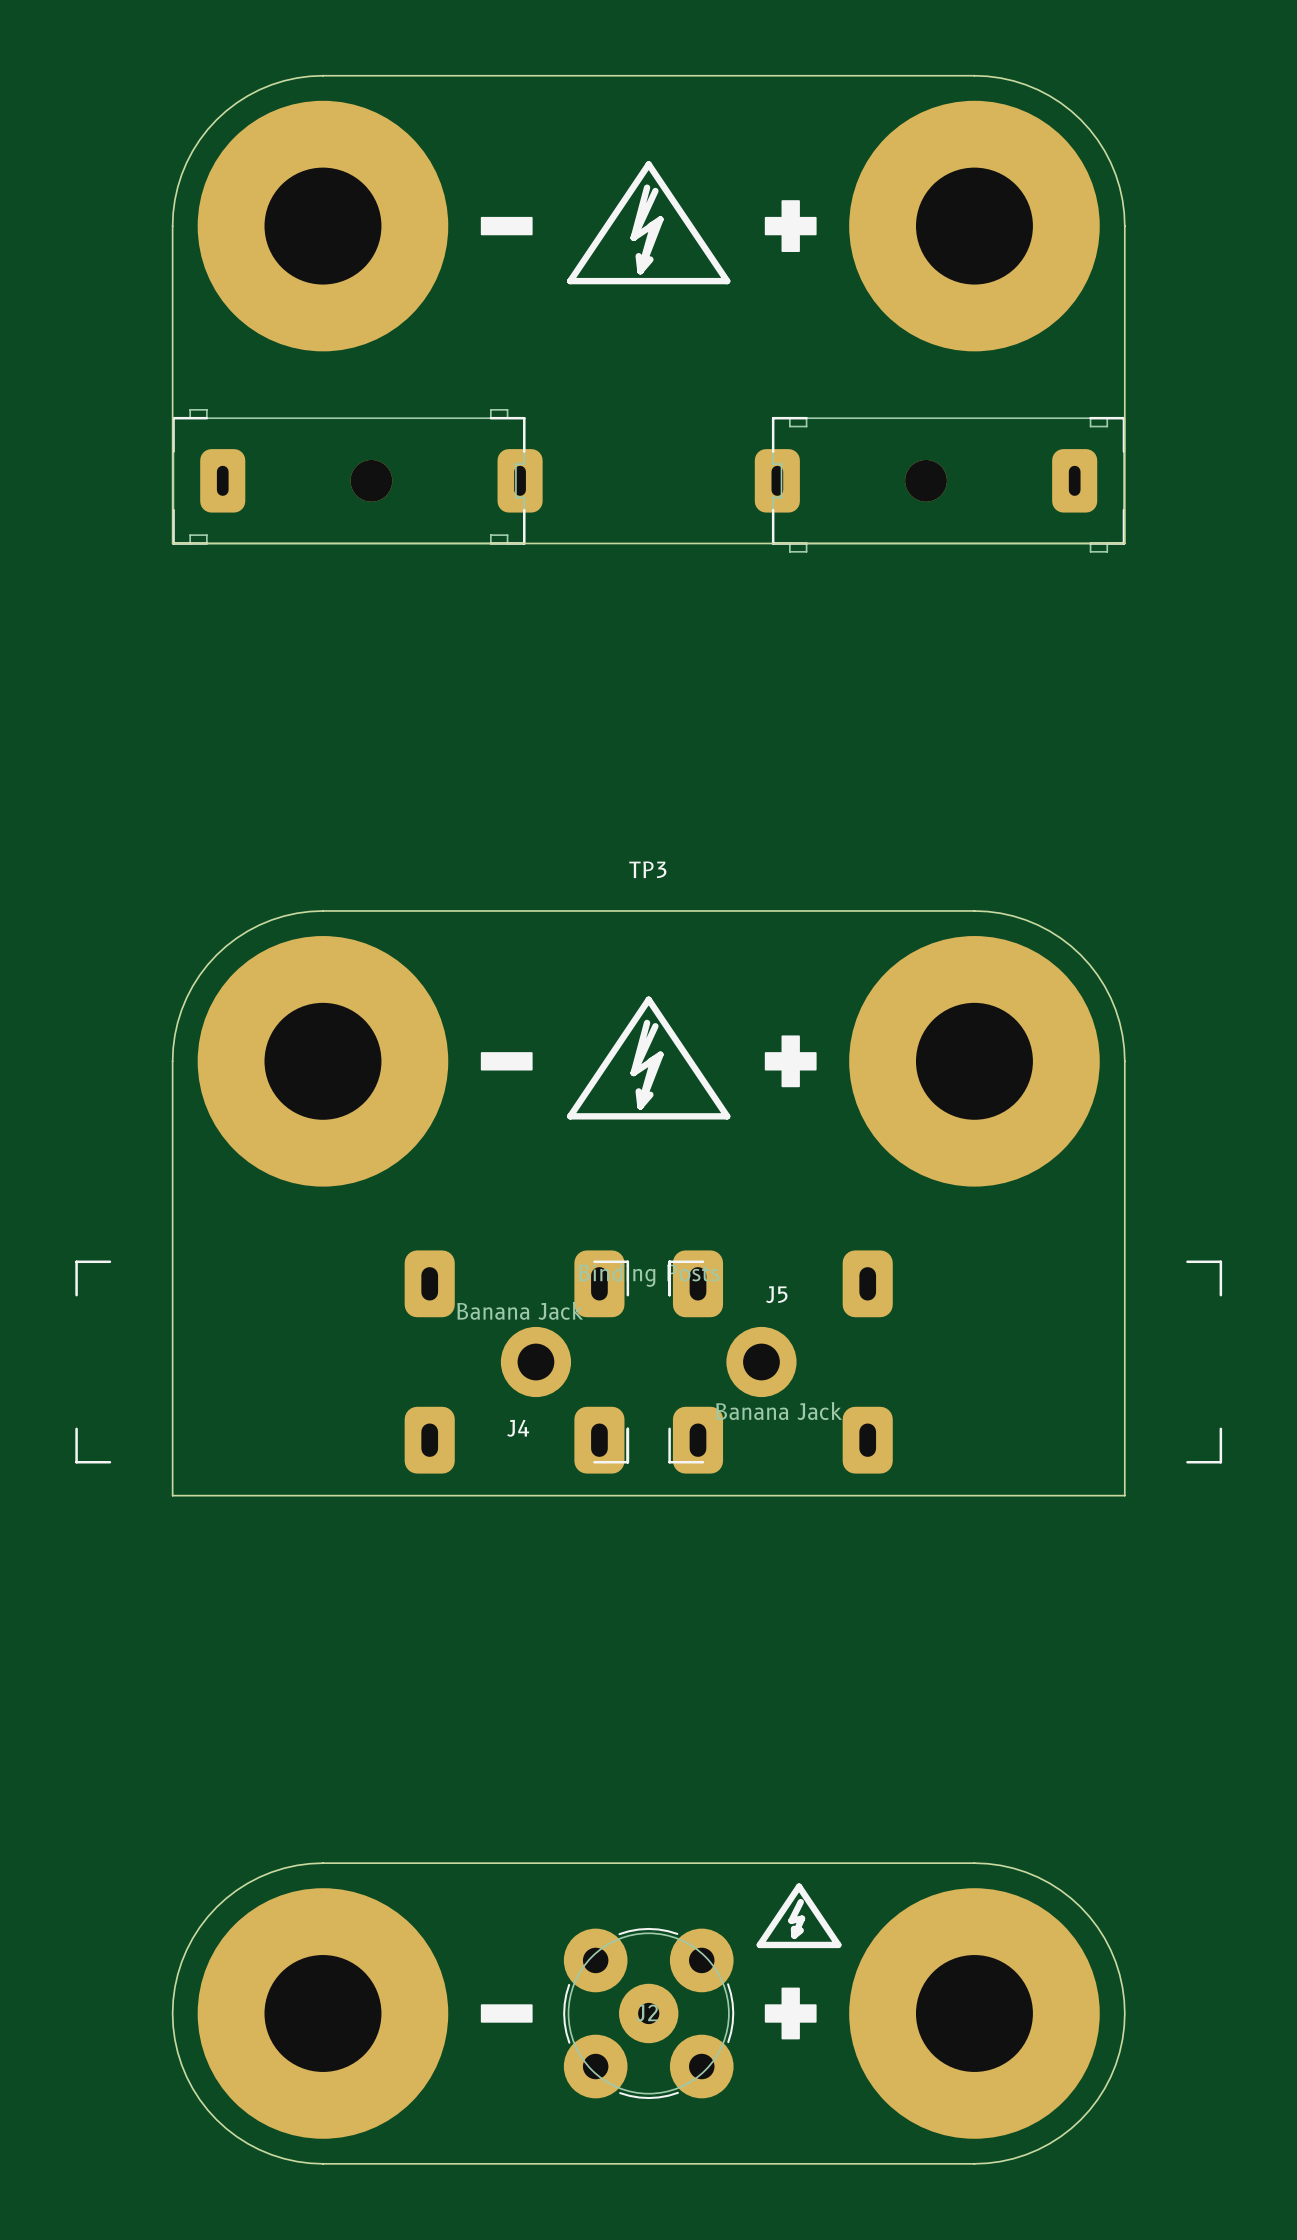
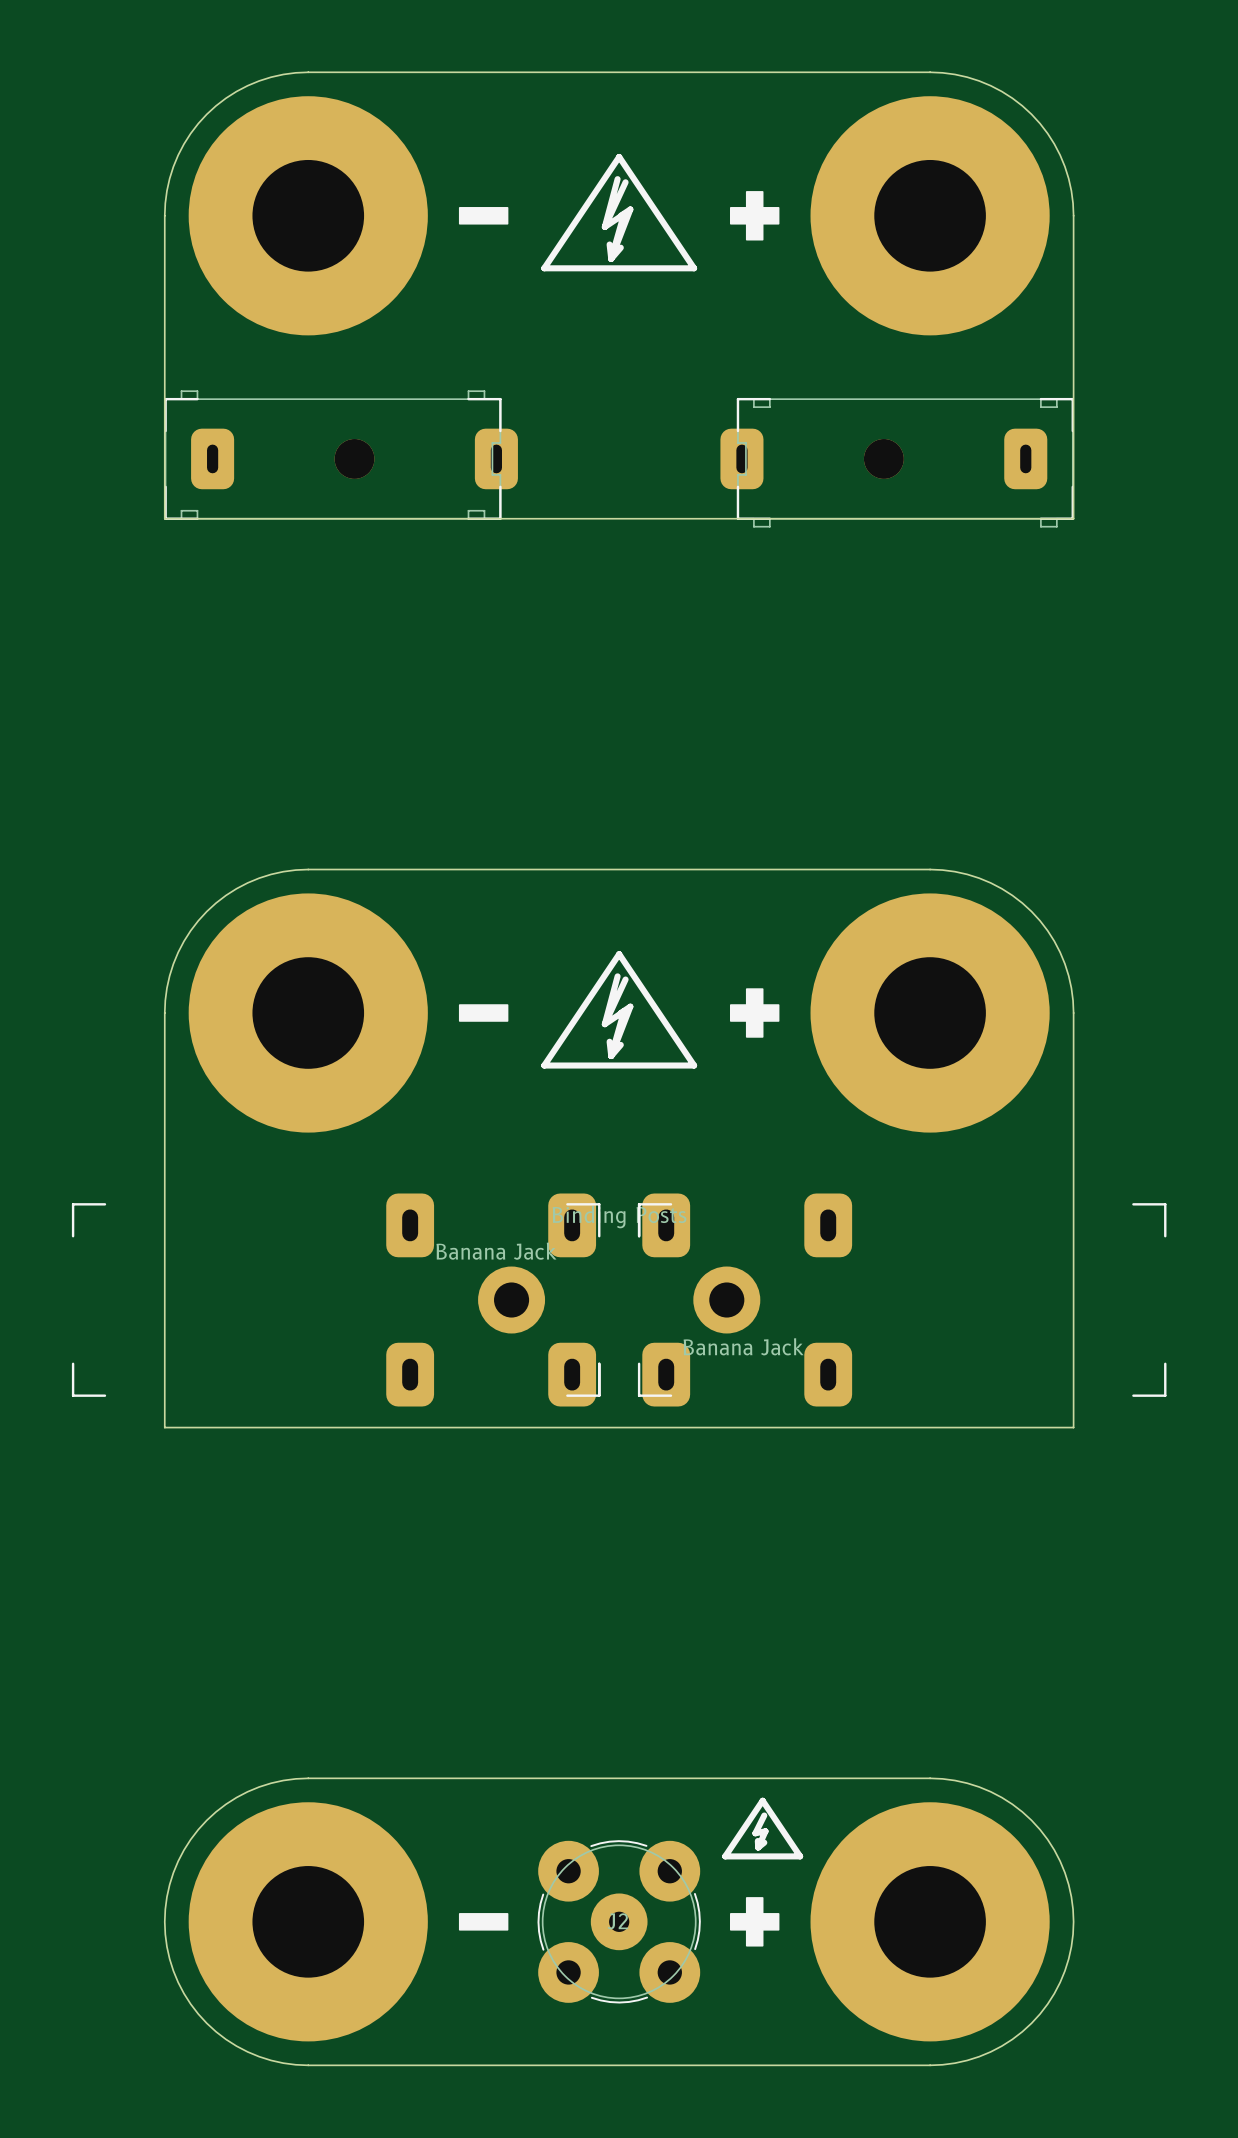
TP3 name: TP3 (647, 869) -> none
J5 name: J5 (776, 1294) -> none
J4 name: J4 (518, 1428) -> none

